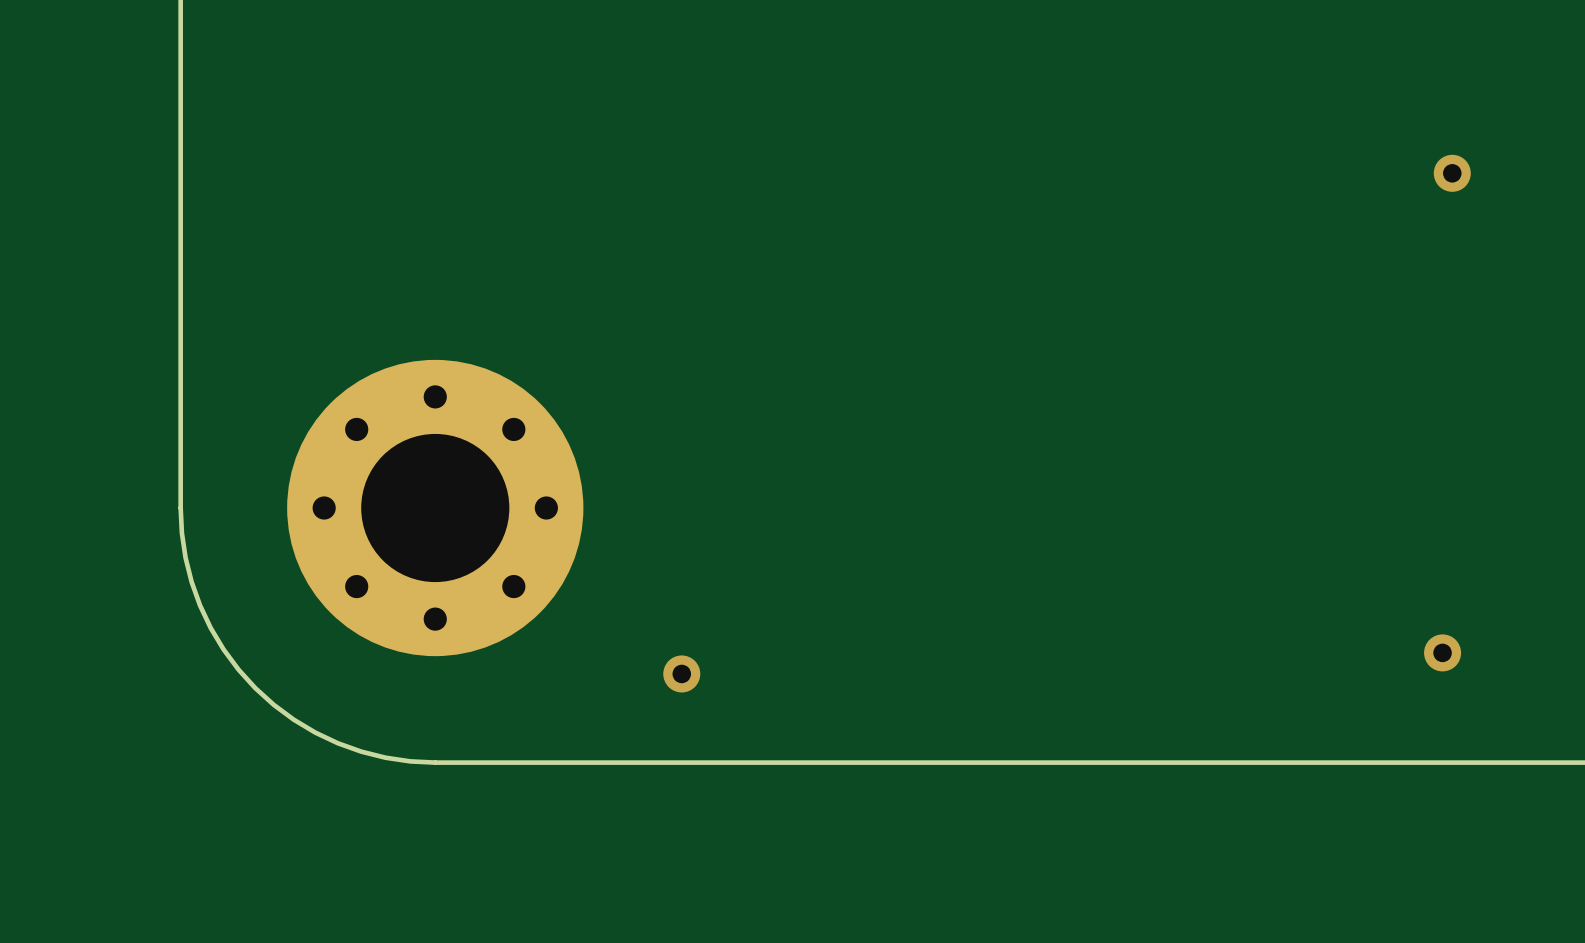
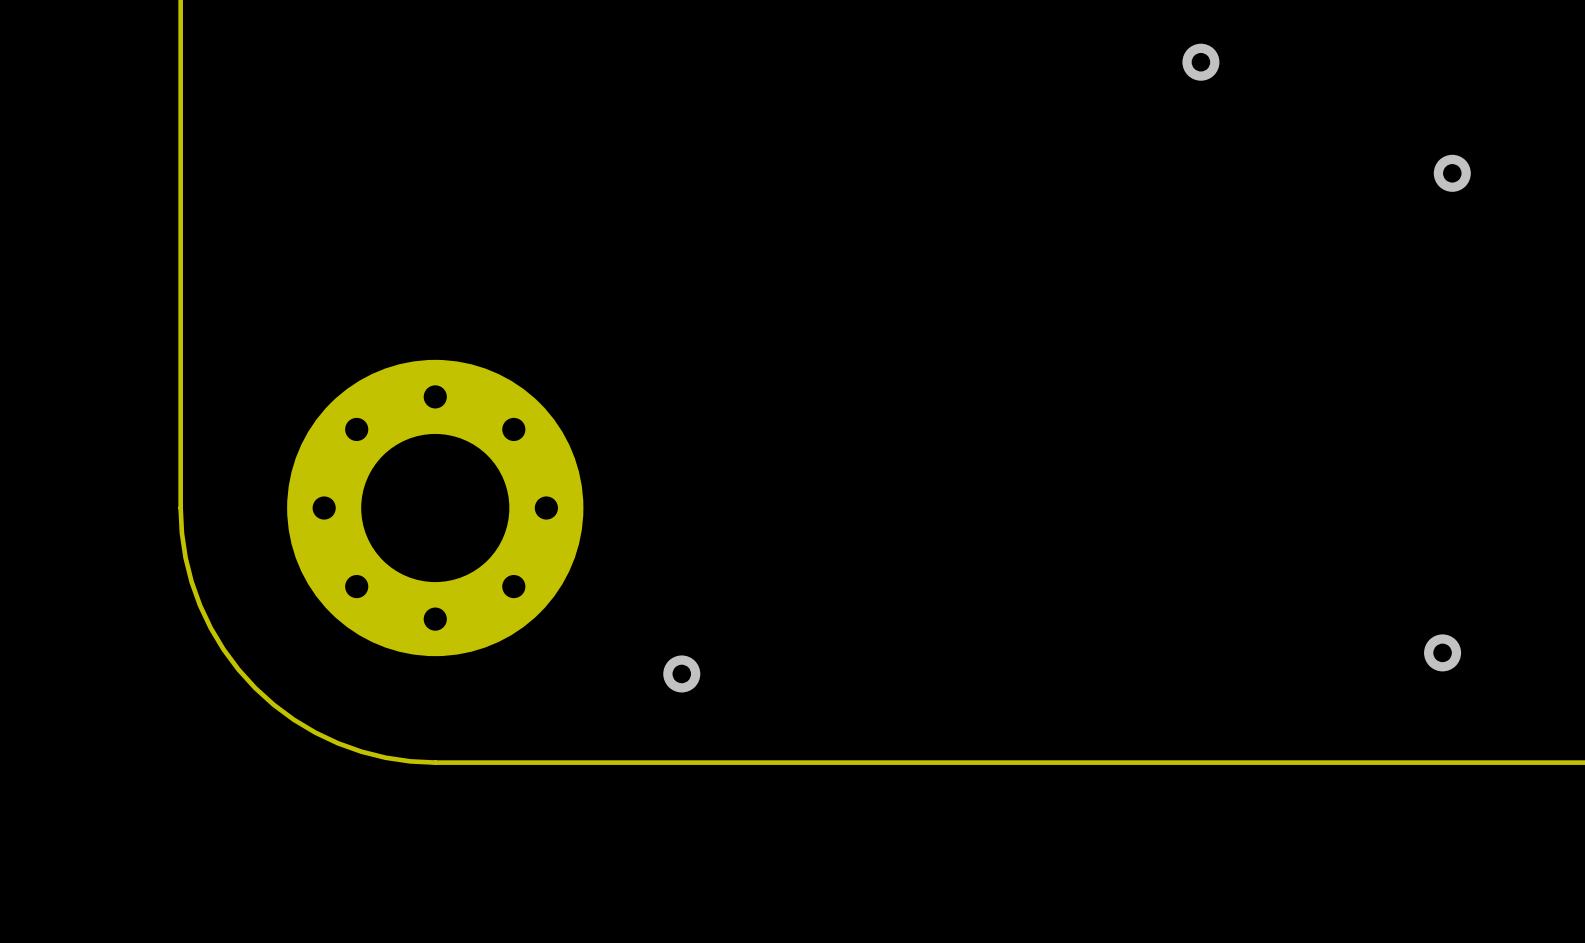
via: none -> (1200, 62)

